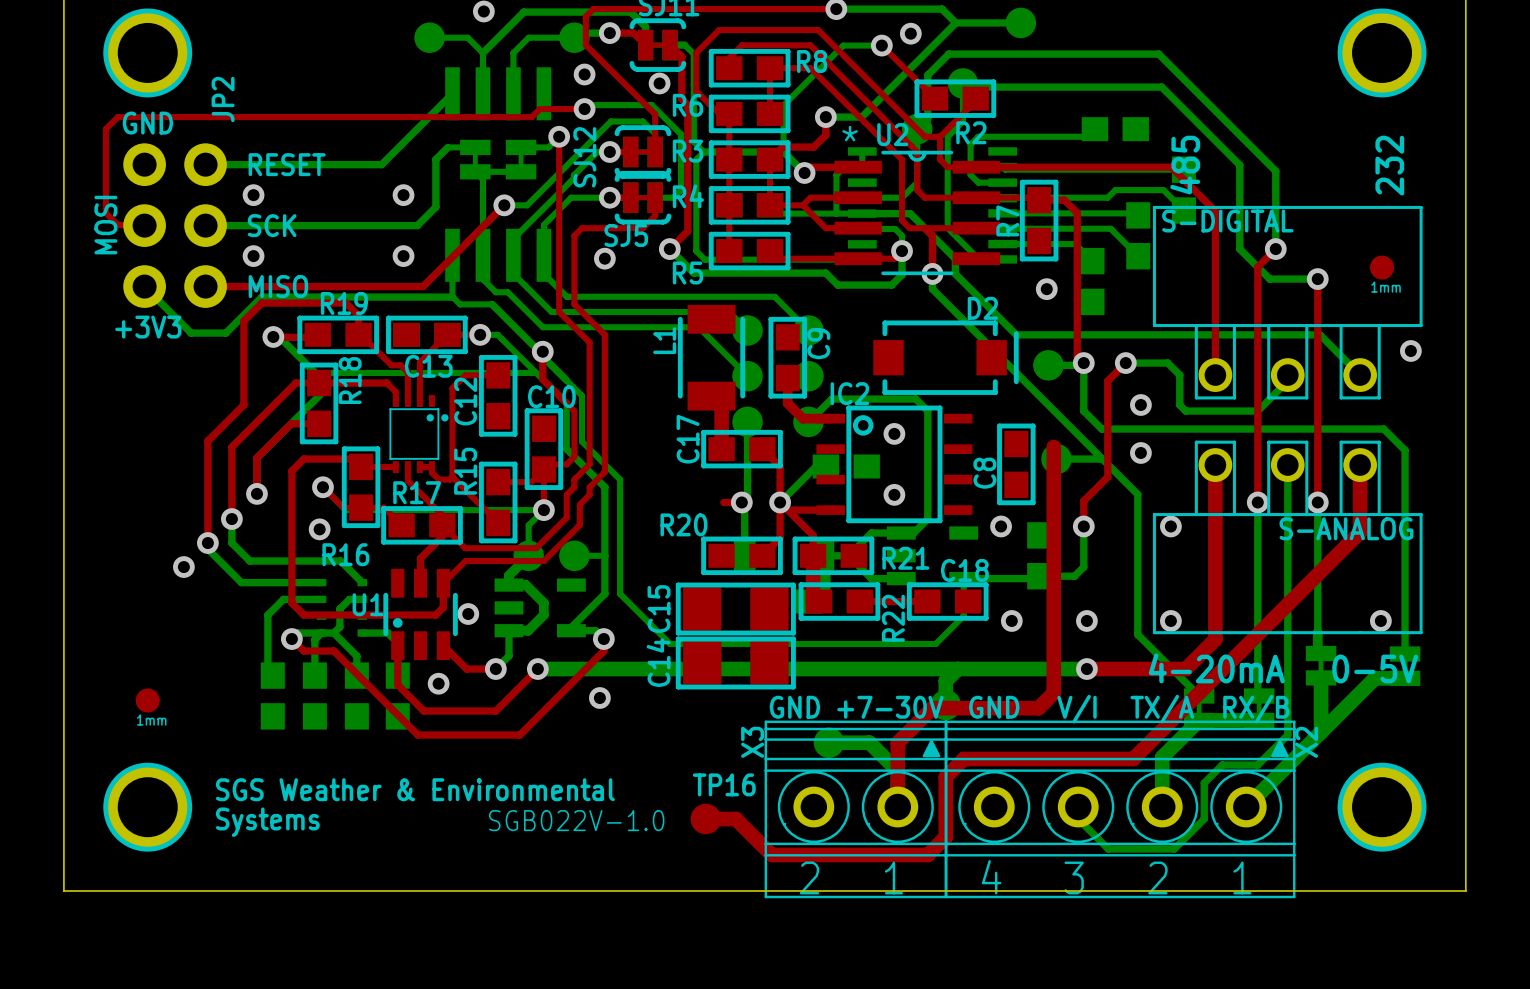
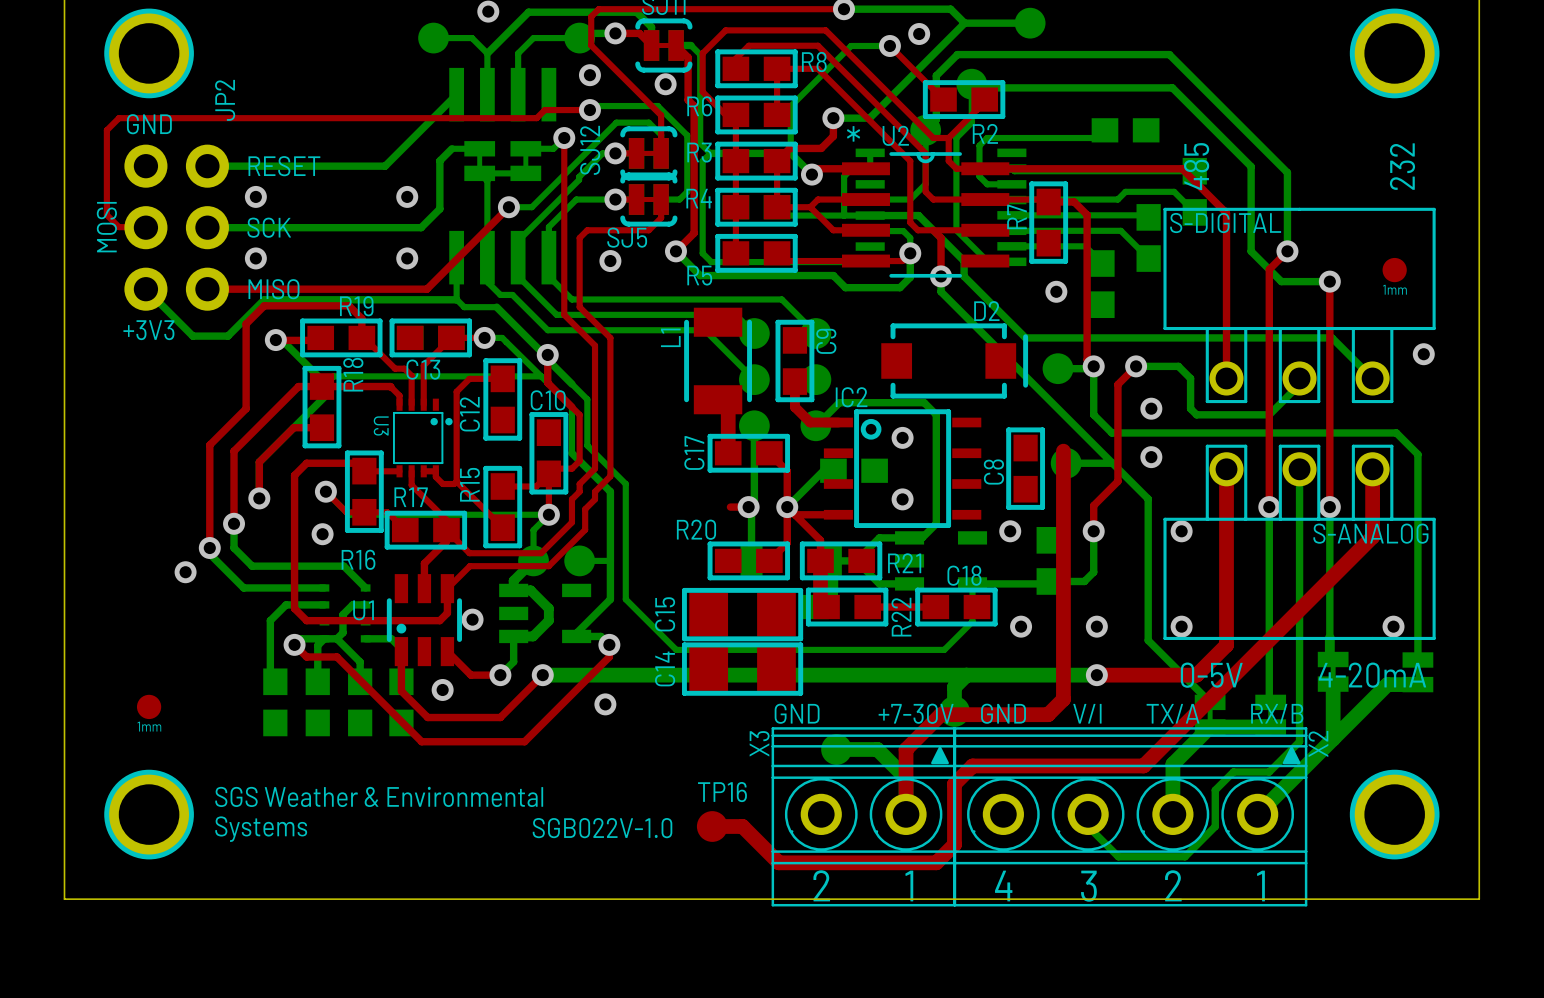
U3 name: none -> U3 (381, 425)
text position: 4-20mA (1216, 668) -> 4-20mA (1372, 675)
text position: 0-5V (1375, 669) -> 0-5V (1211, 675)

